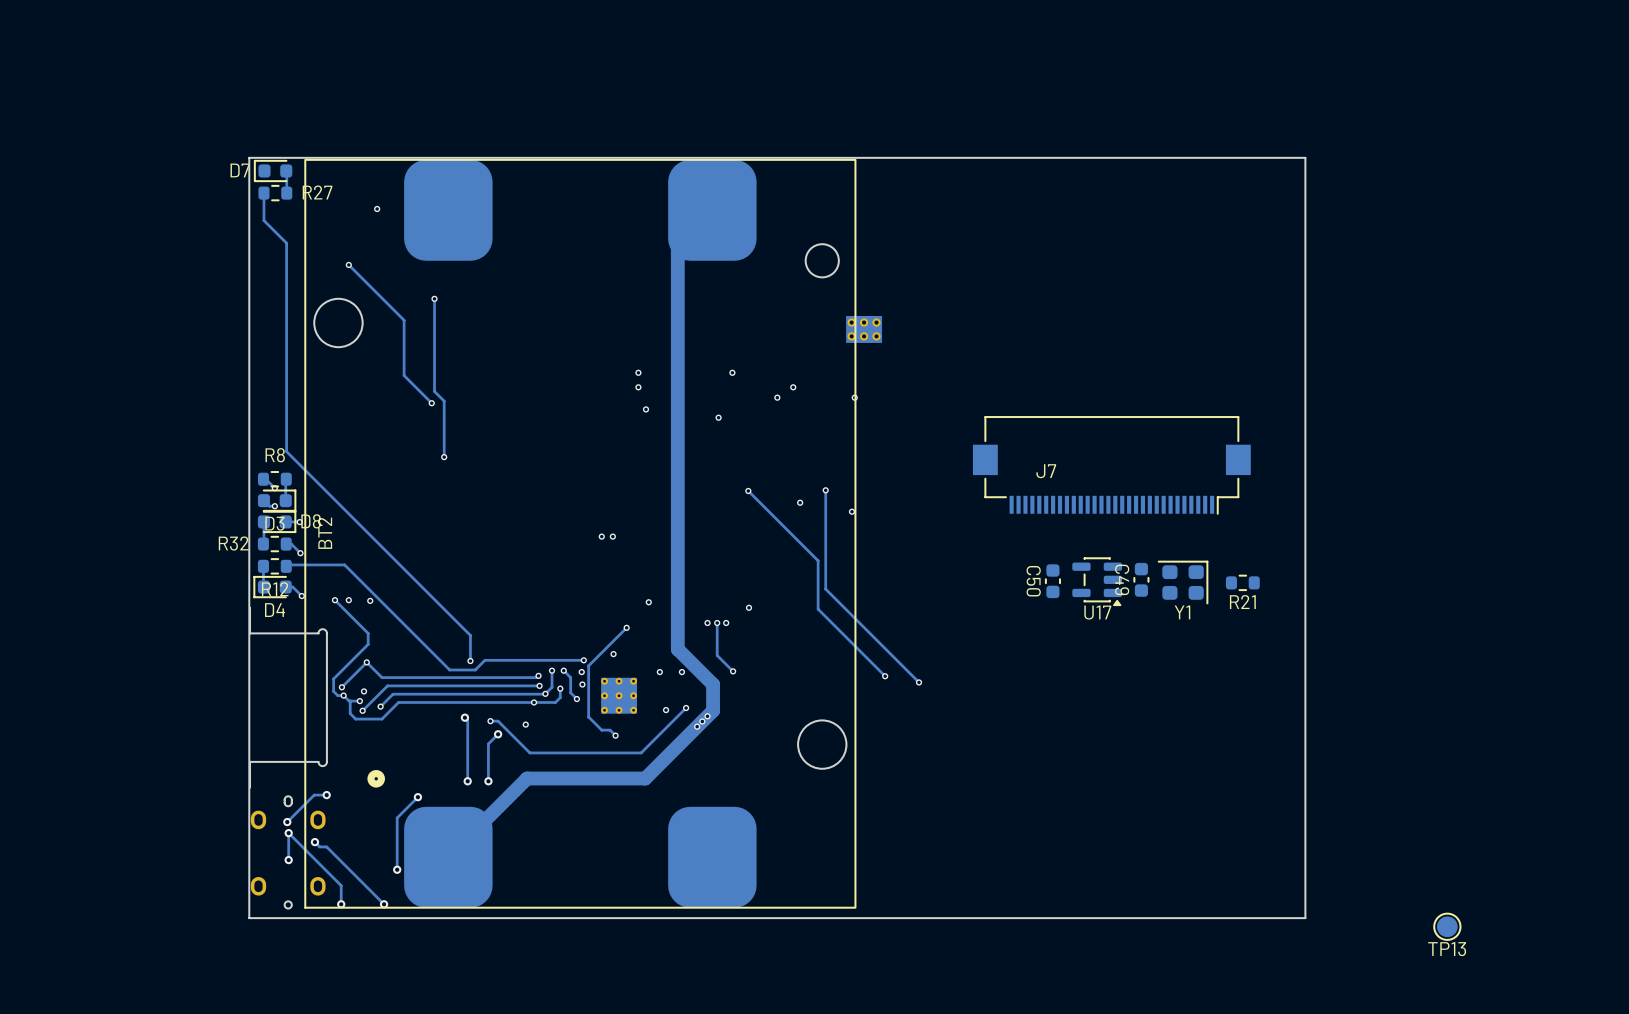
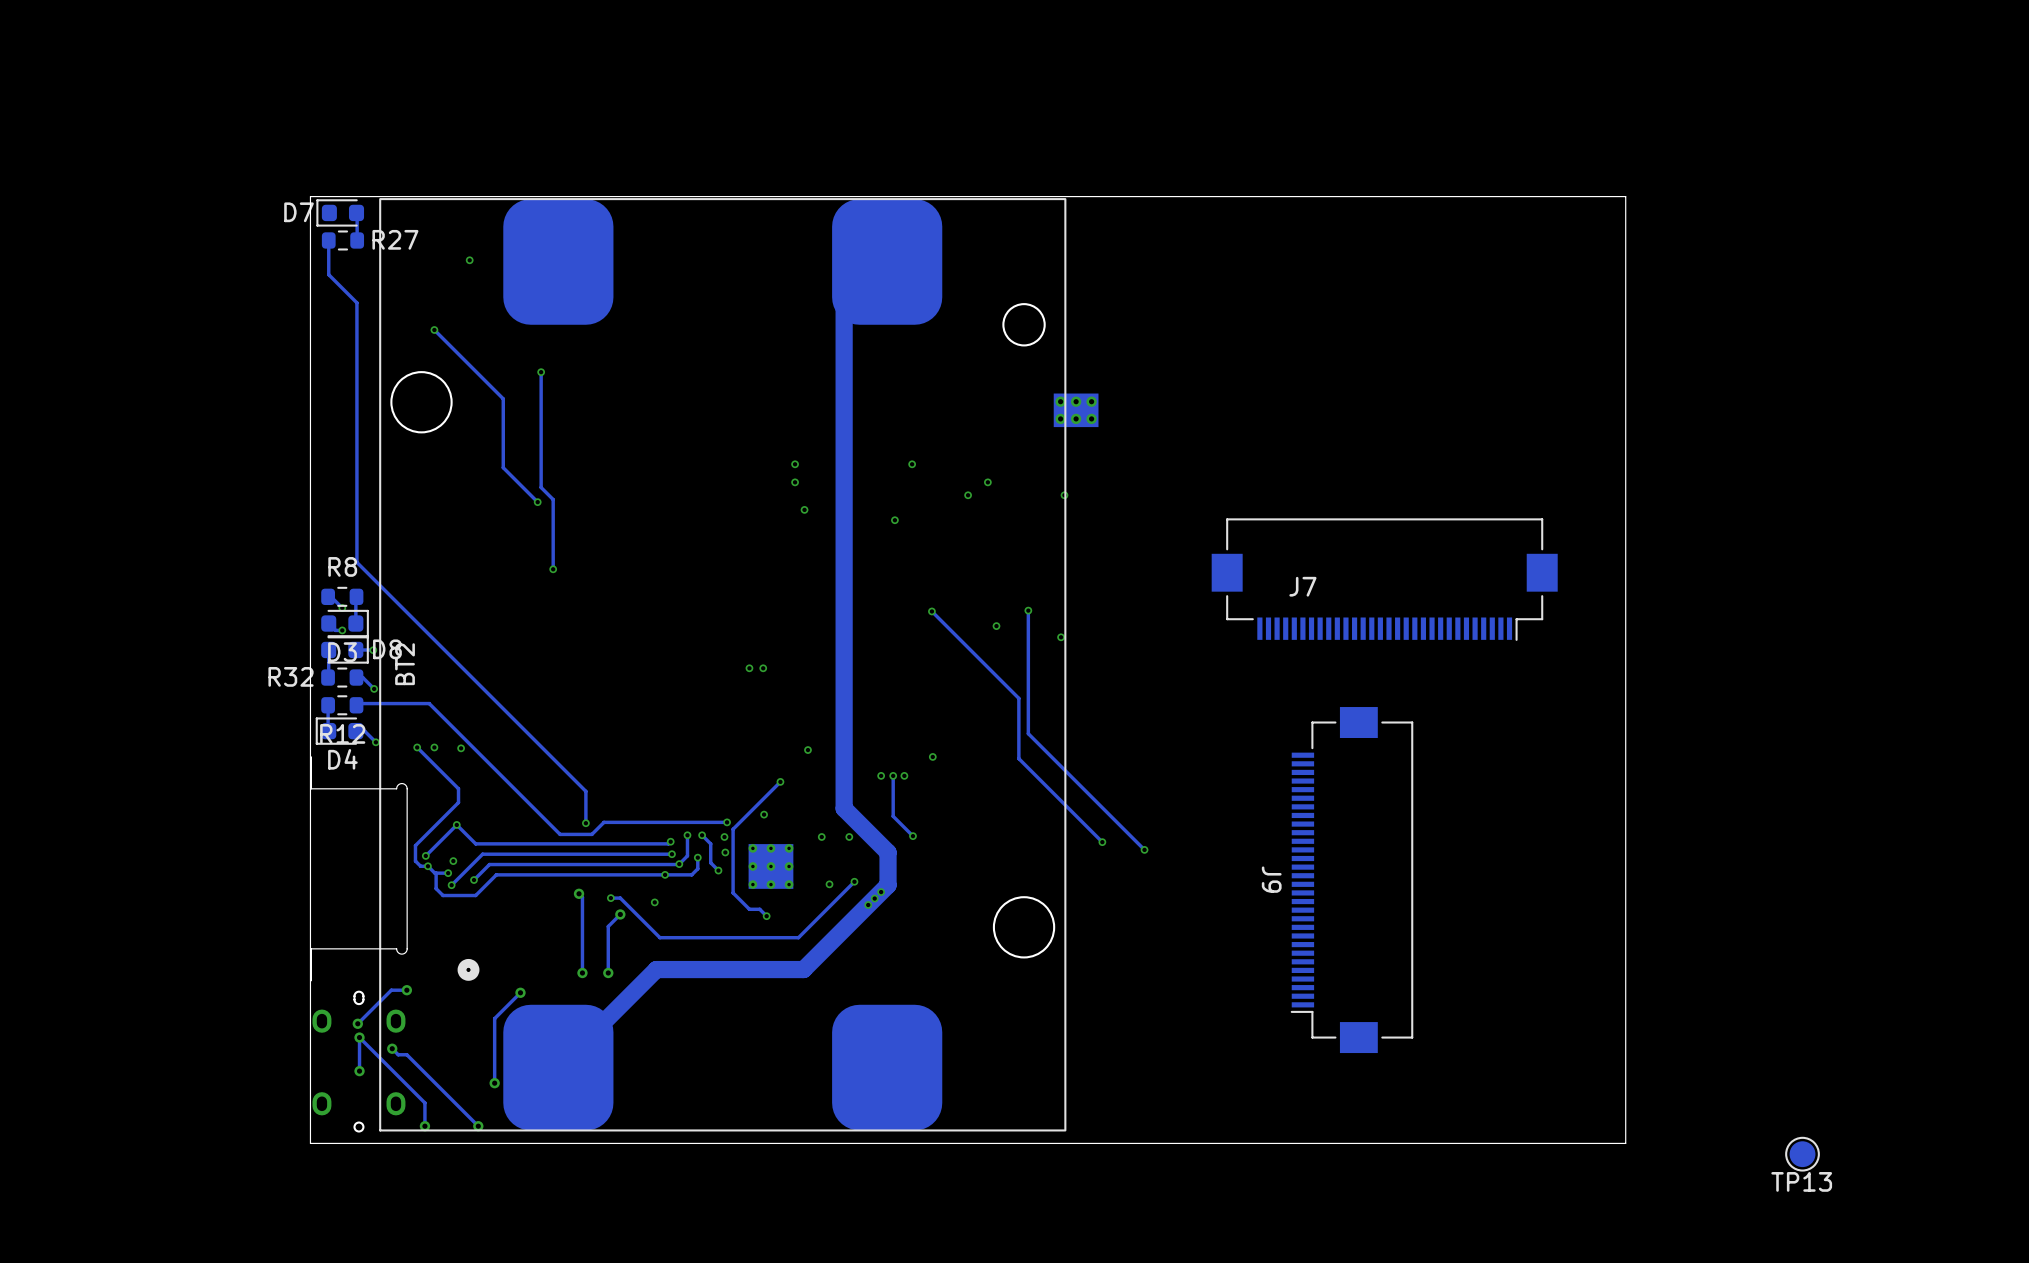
C49: (1141, 579) -> none
C50: (1052, 581) -> none
U17: (1097, 581) -> none
Y1: (1183, 582) -> none
R21: (1242, 582) -> none
J9: none -> (1351, 880)

